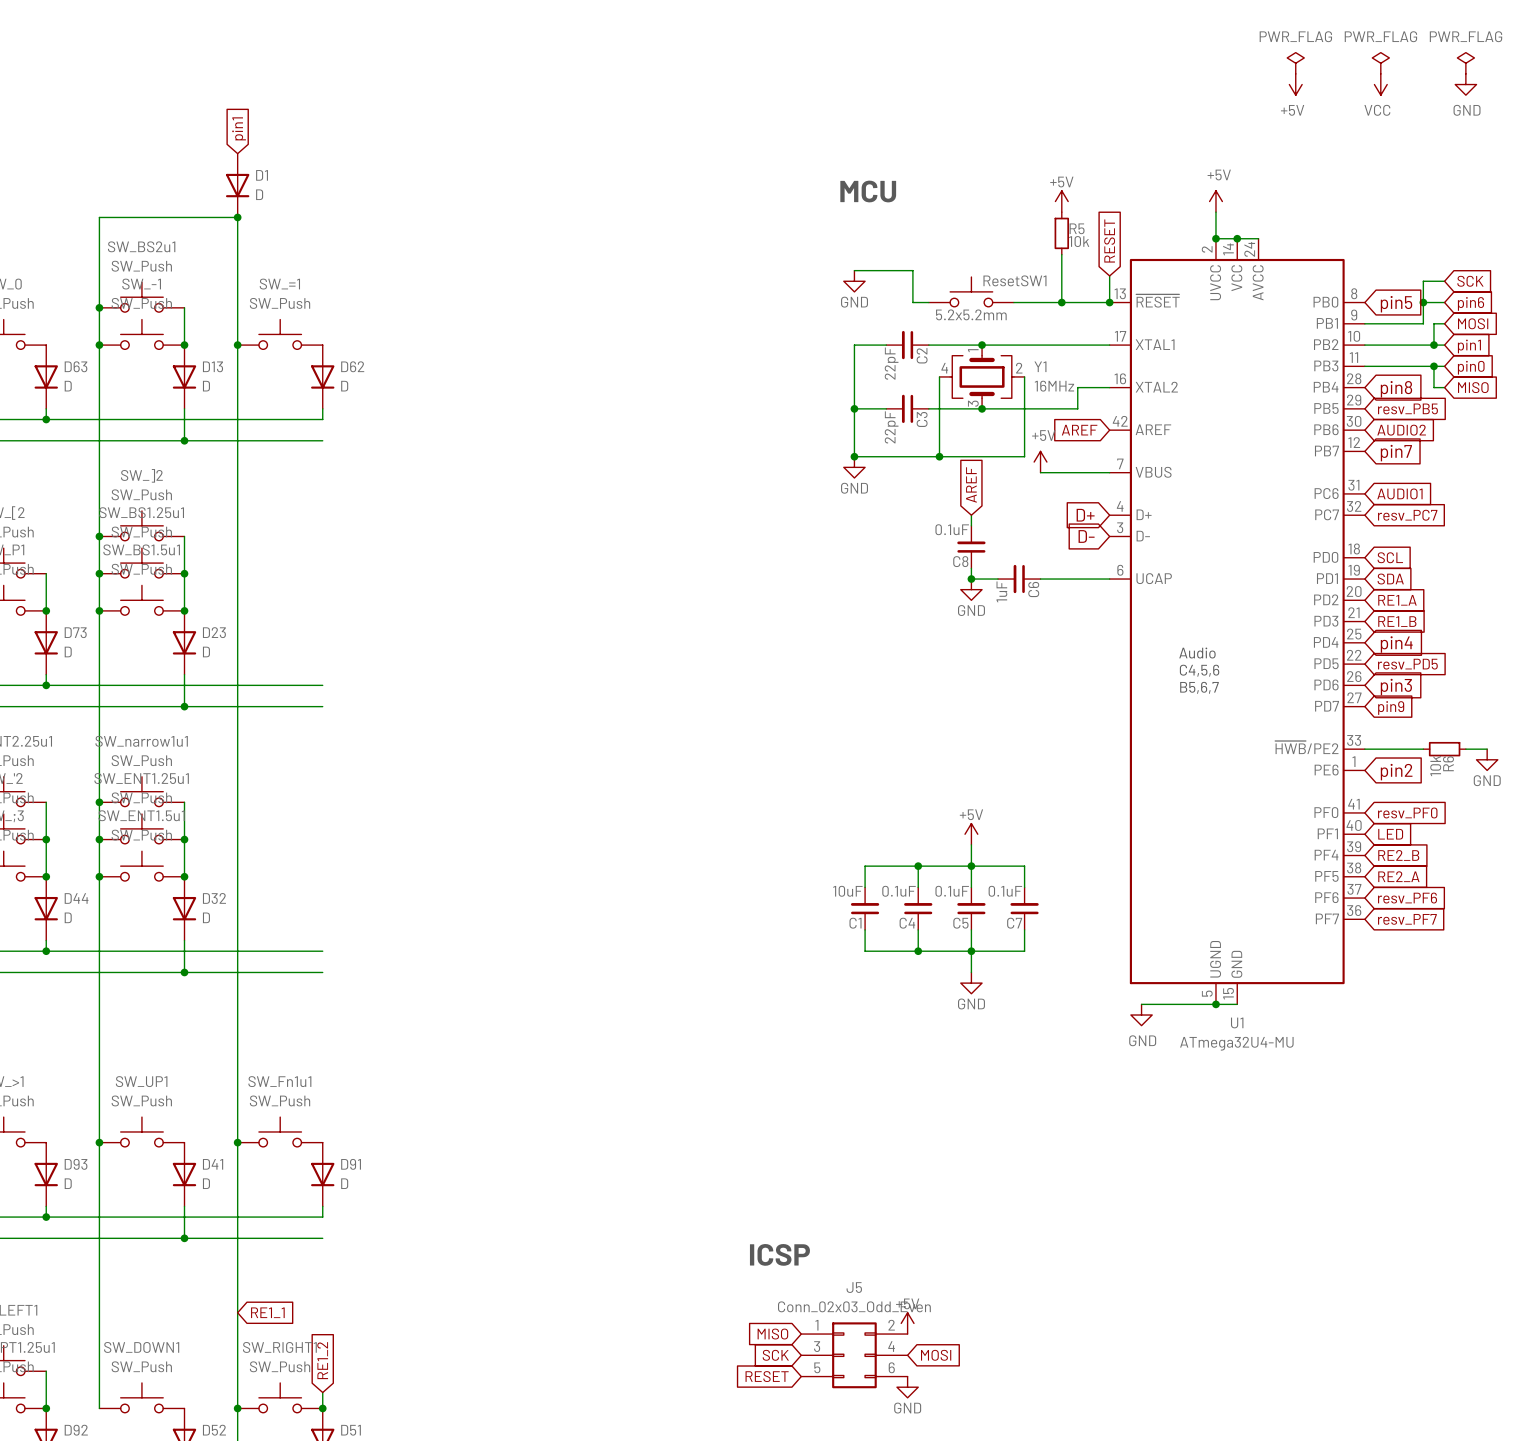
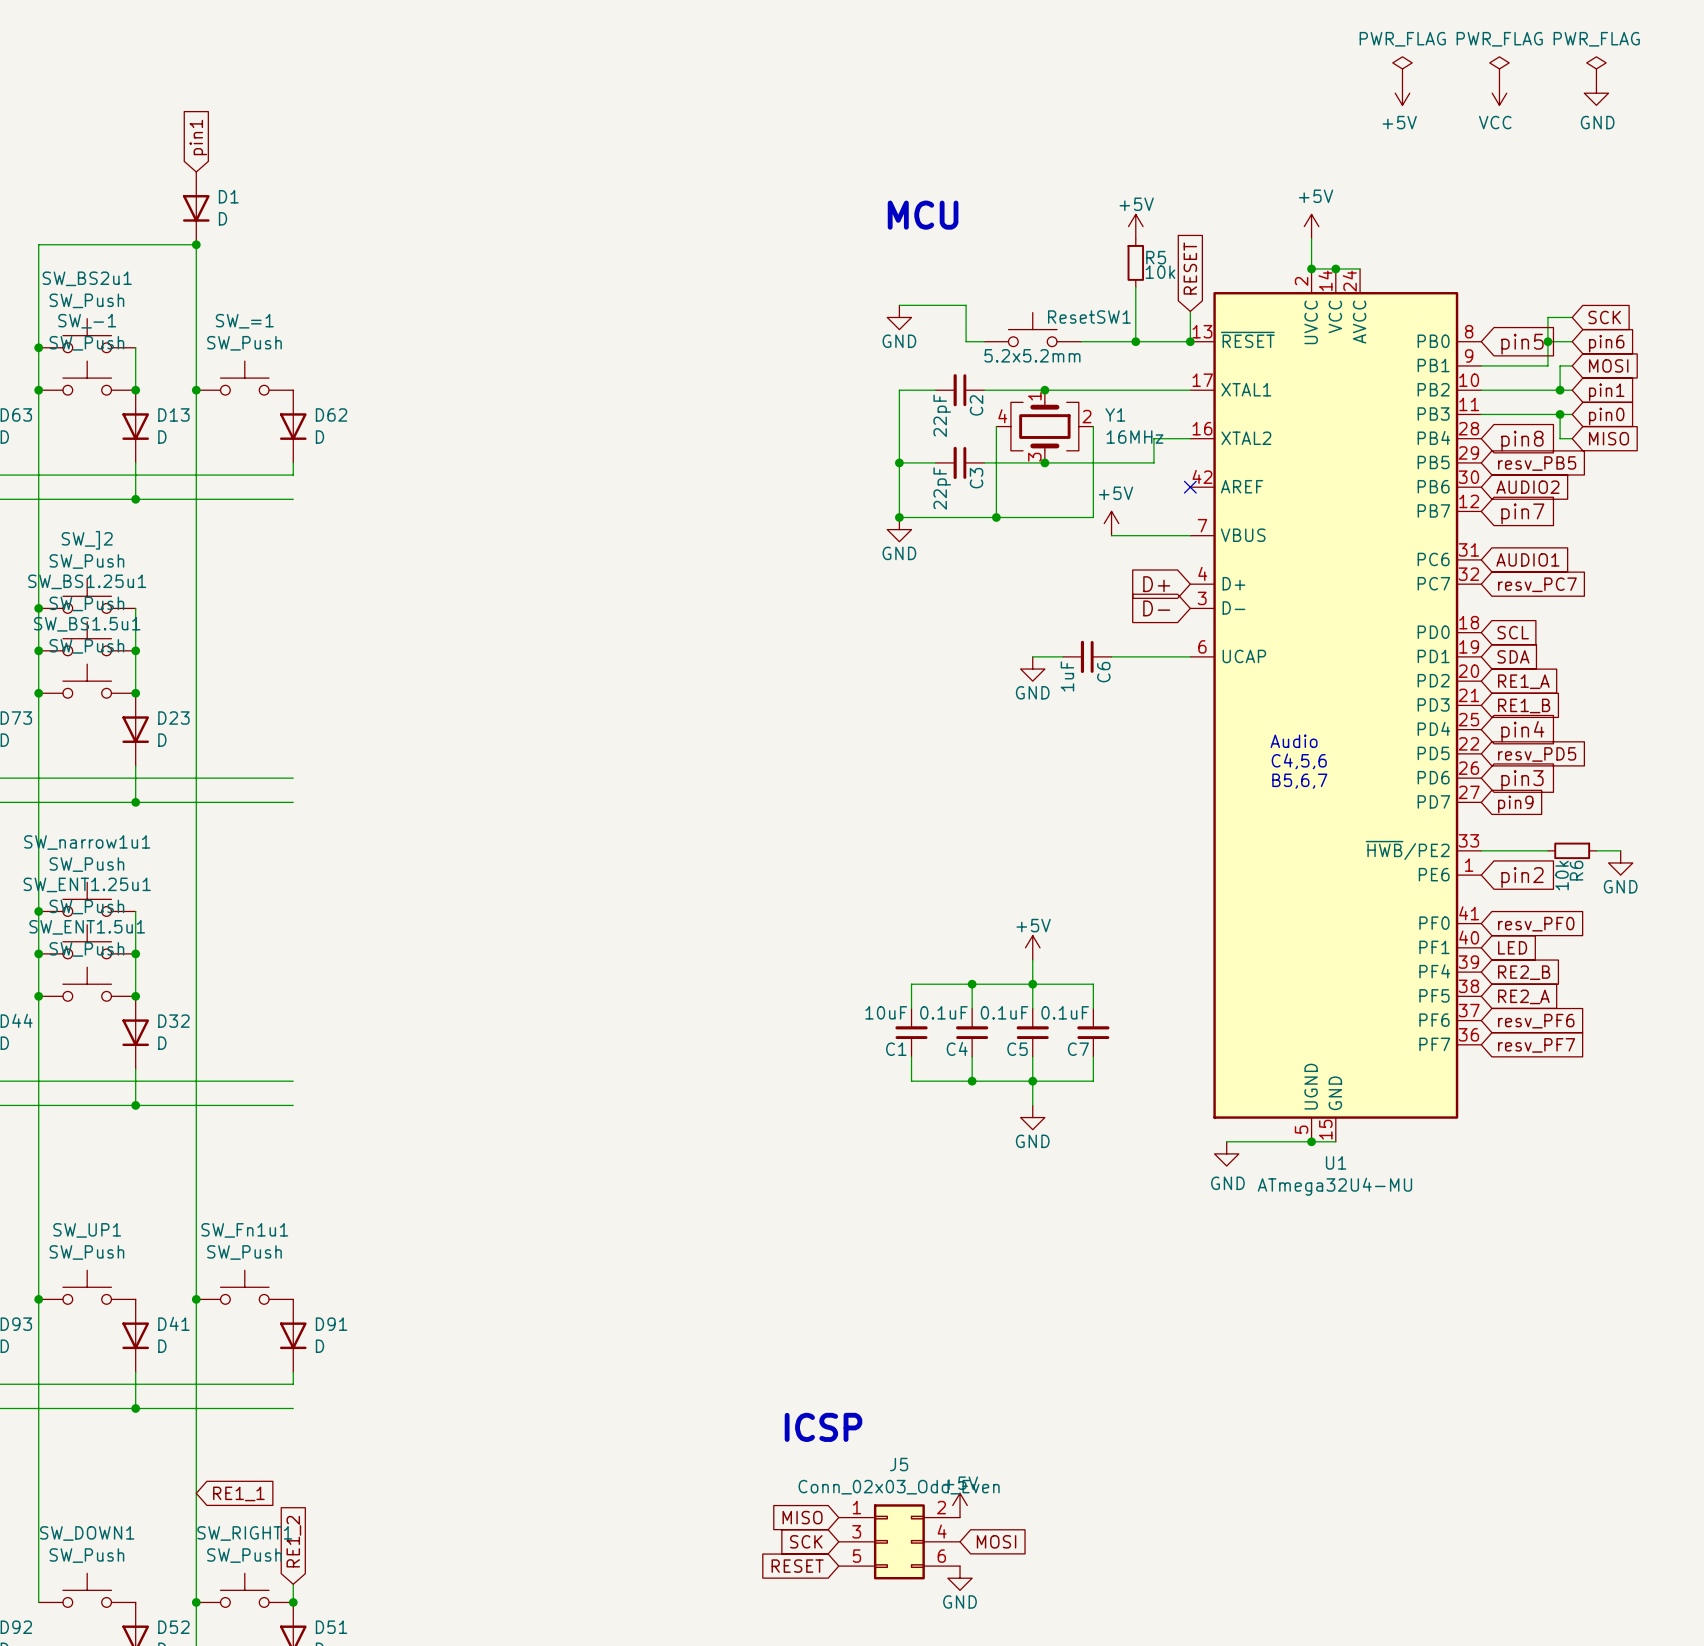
global label: AREF (1079, 430) -> none
no-connect mark: none -> (1190, 487)
global label: AREF (971, 485) -> none
wire: (971, 515) (971, 525) -> none
C8: 0.1uF (971, 547) -> none
wire: (971, 568) (971, 579) -> none
junction: (971, 579) -> none

